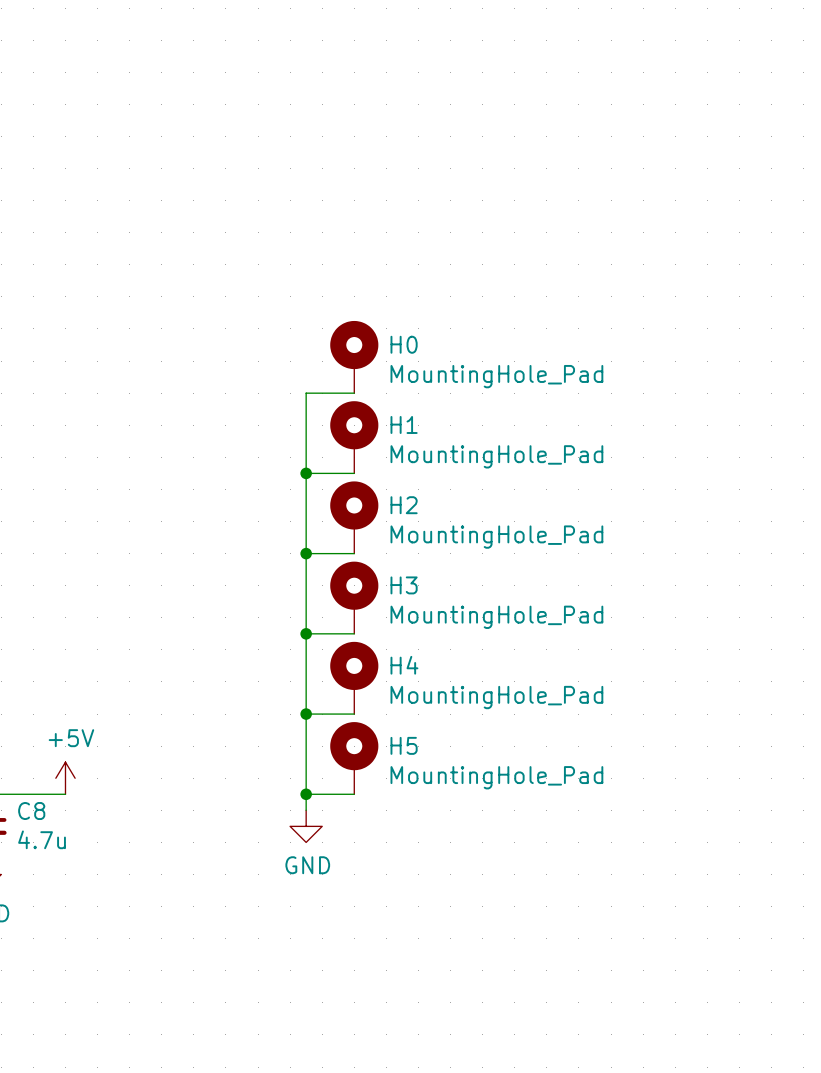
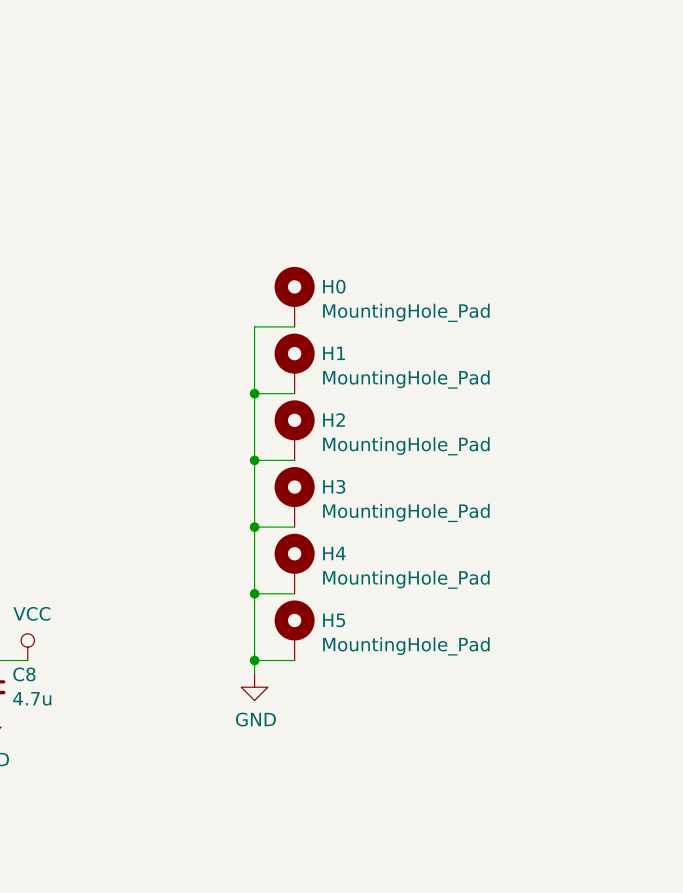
power symbol: none -> VCC (27, 647)
power symbol: +5V (65, 778) -> none
wire: (33, 794) (65, 794) -> none

